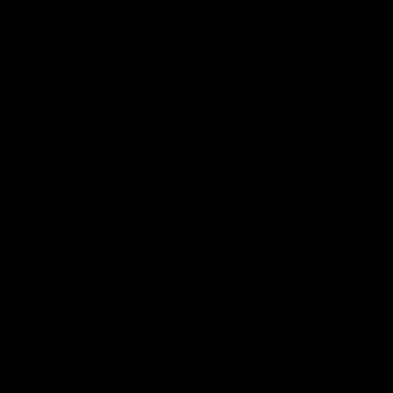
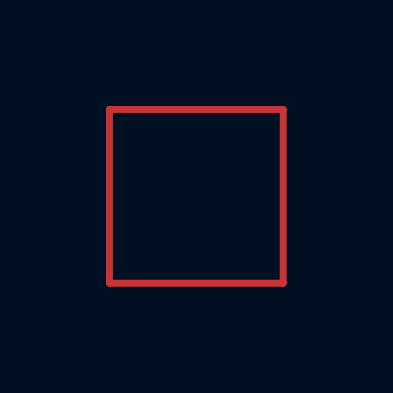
top track: none -> (283, 109) (109, 109) (109, 283) (283, 283) (283, 109)

